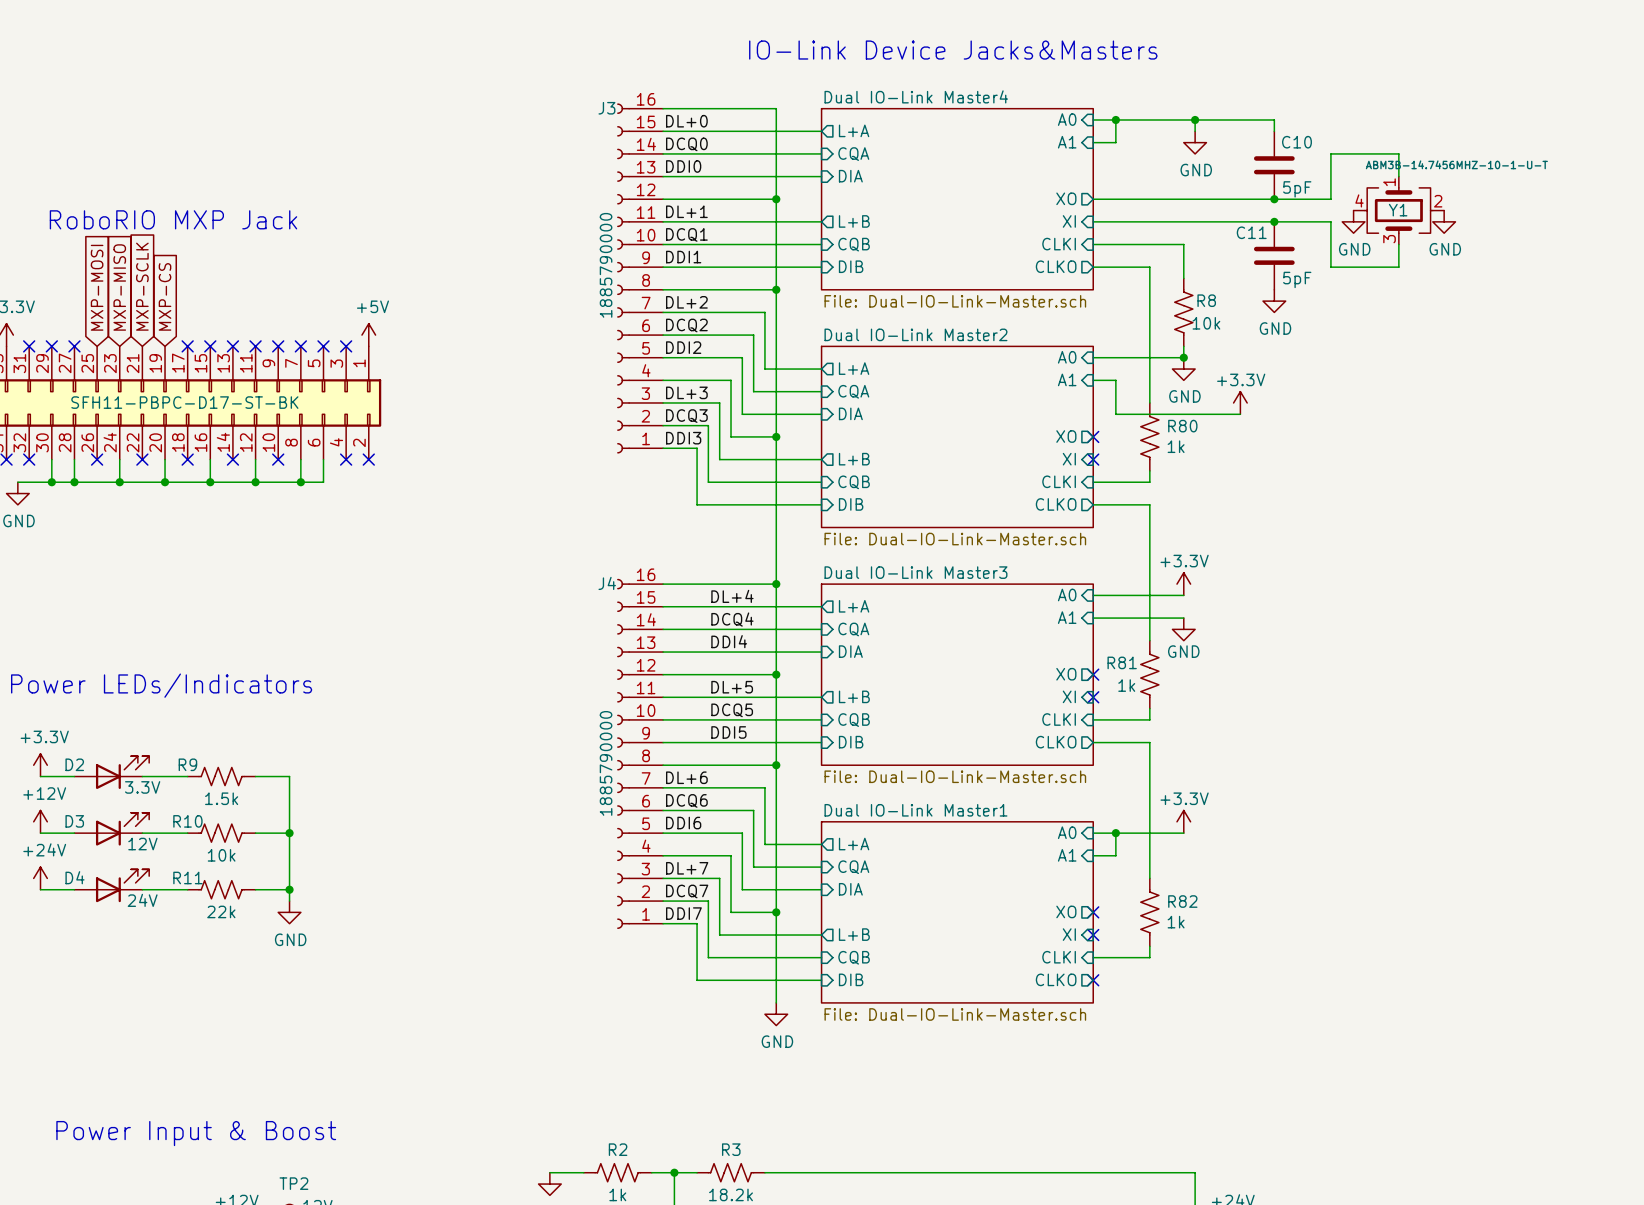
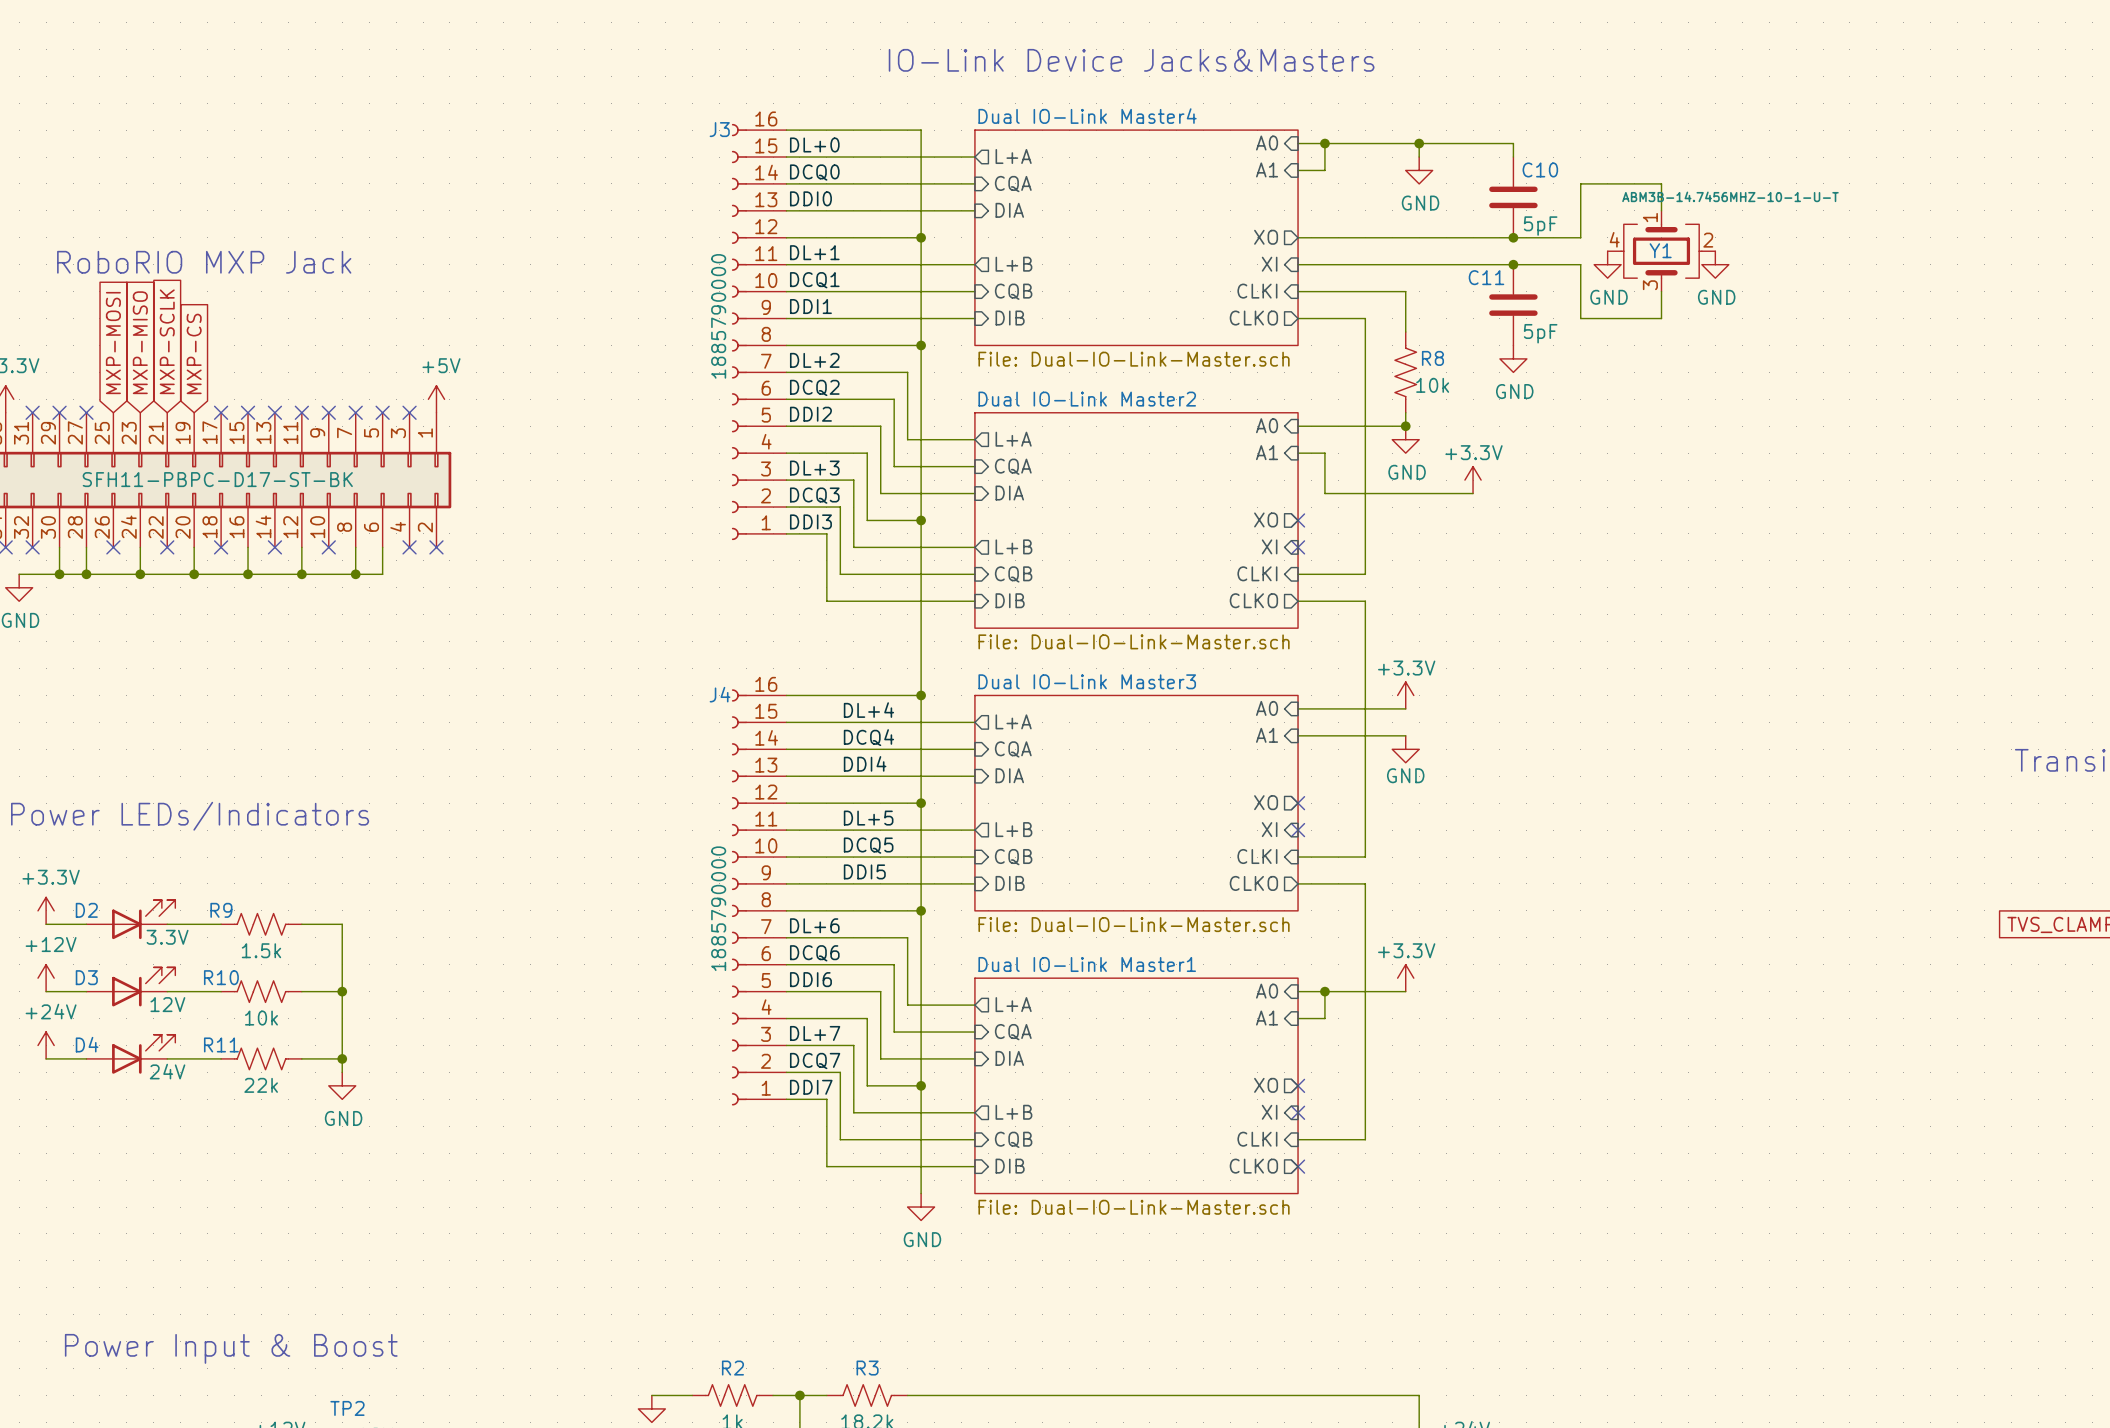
R80: 1k (1149, 436) -> none
R81: 1k (1149, 674) -> none
R82: 1k (1149, 912) -> none

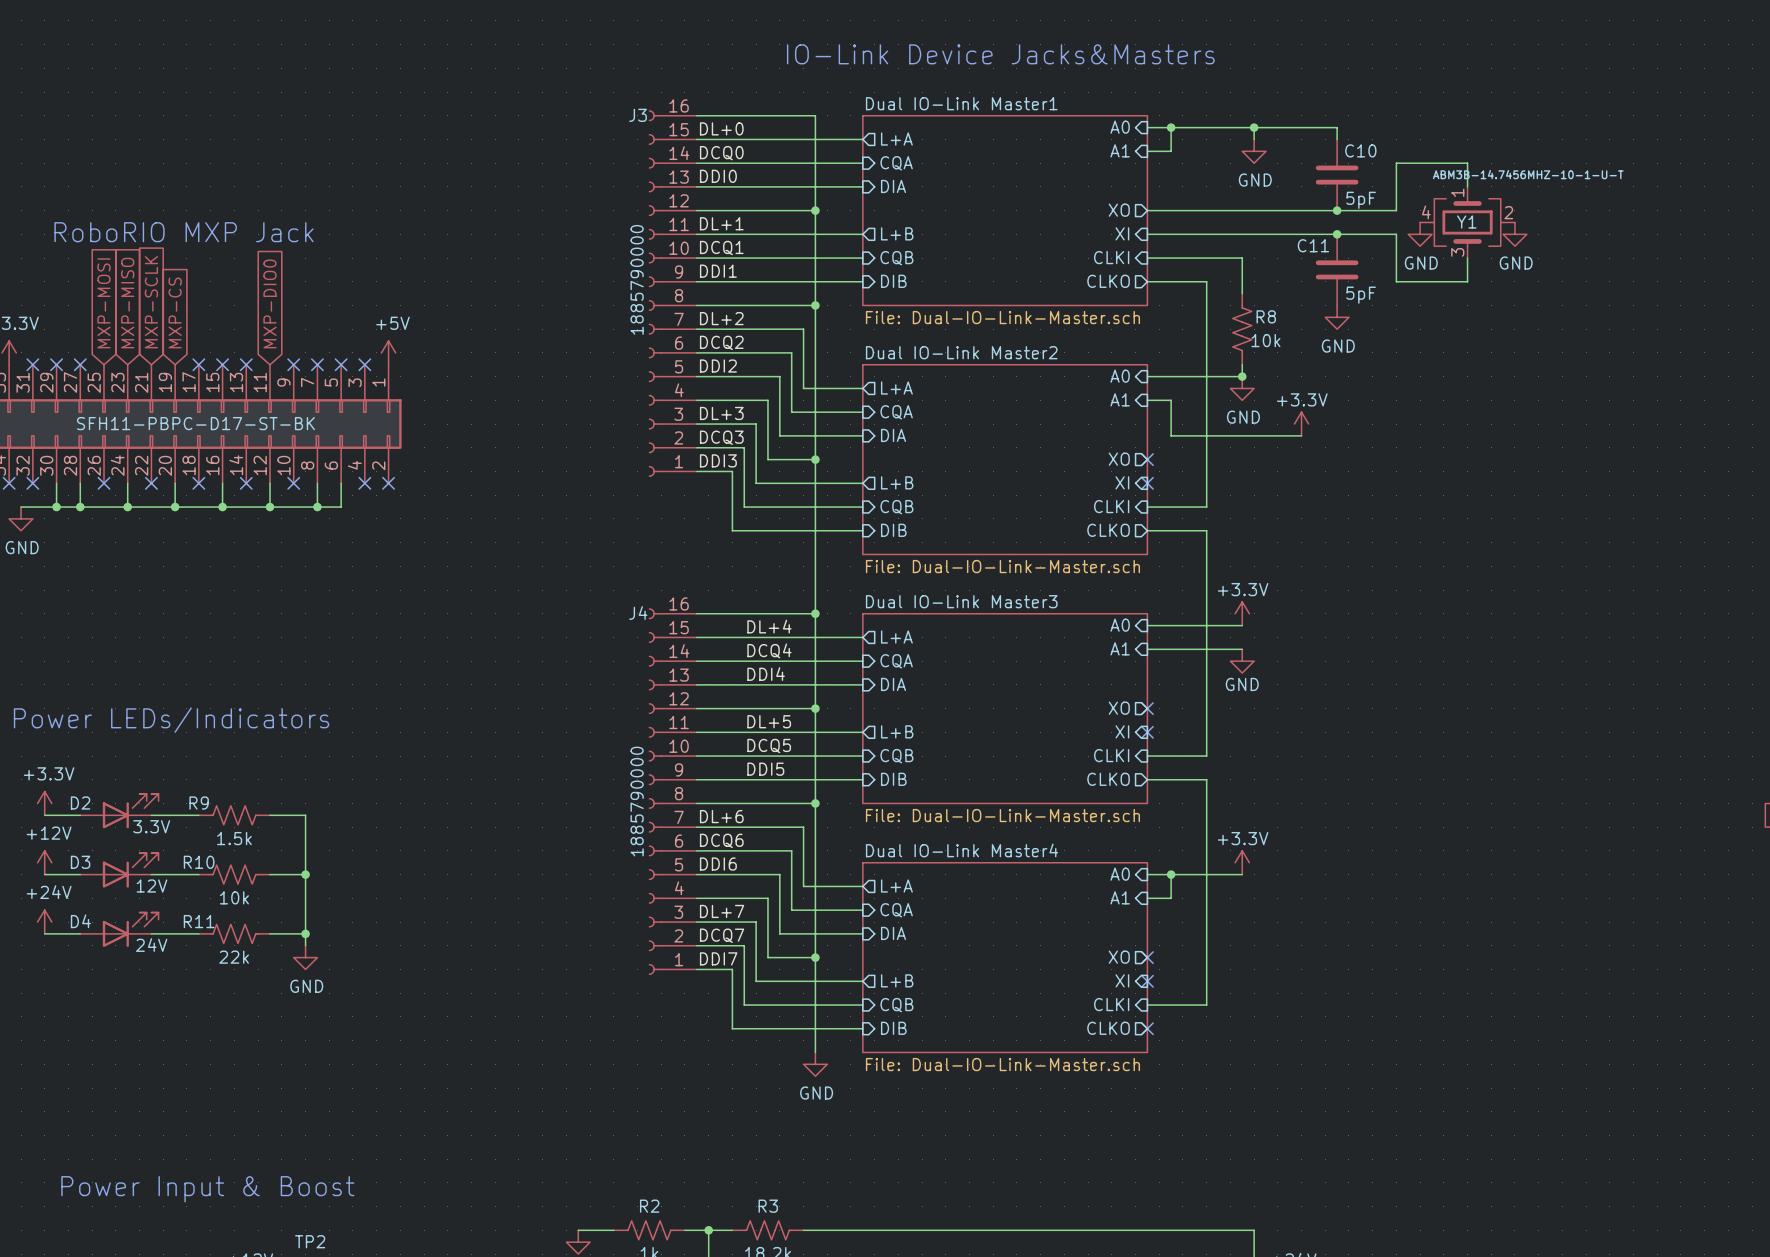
sheet Dual IO-Link Master4 name: Dual IO-Link Master4 (1087, 116) -> Dual IO-Link Master1 (961, 103)
global label: none -> MXP-DIO0 (269, 303)
no-connect mark: (301, 412) -> none
sheet Dual IO-Link Master1 name: Dual IO-Link Master1 (1087, 964) -> Dual IO-Link Master4 (962, 850)

